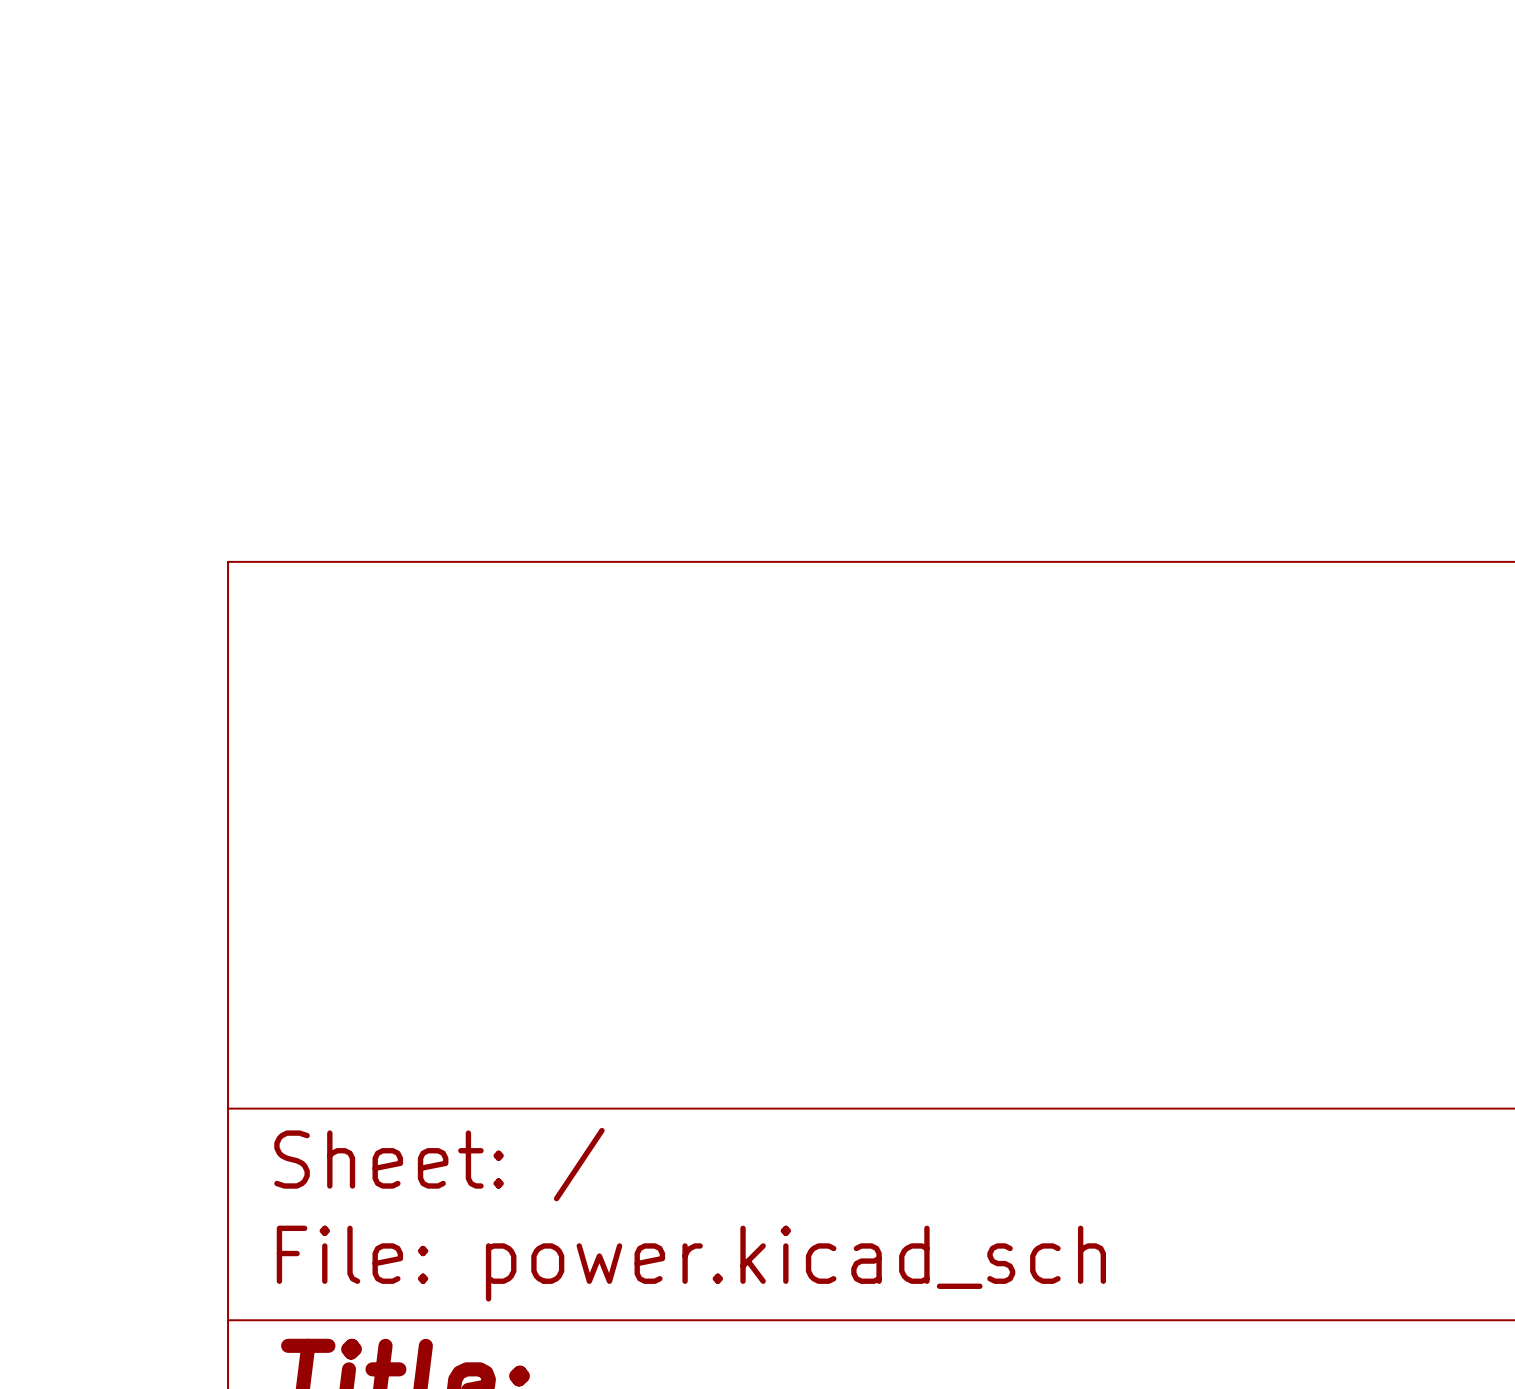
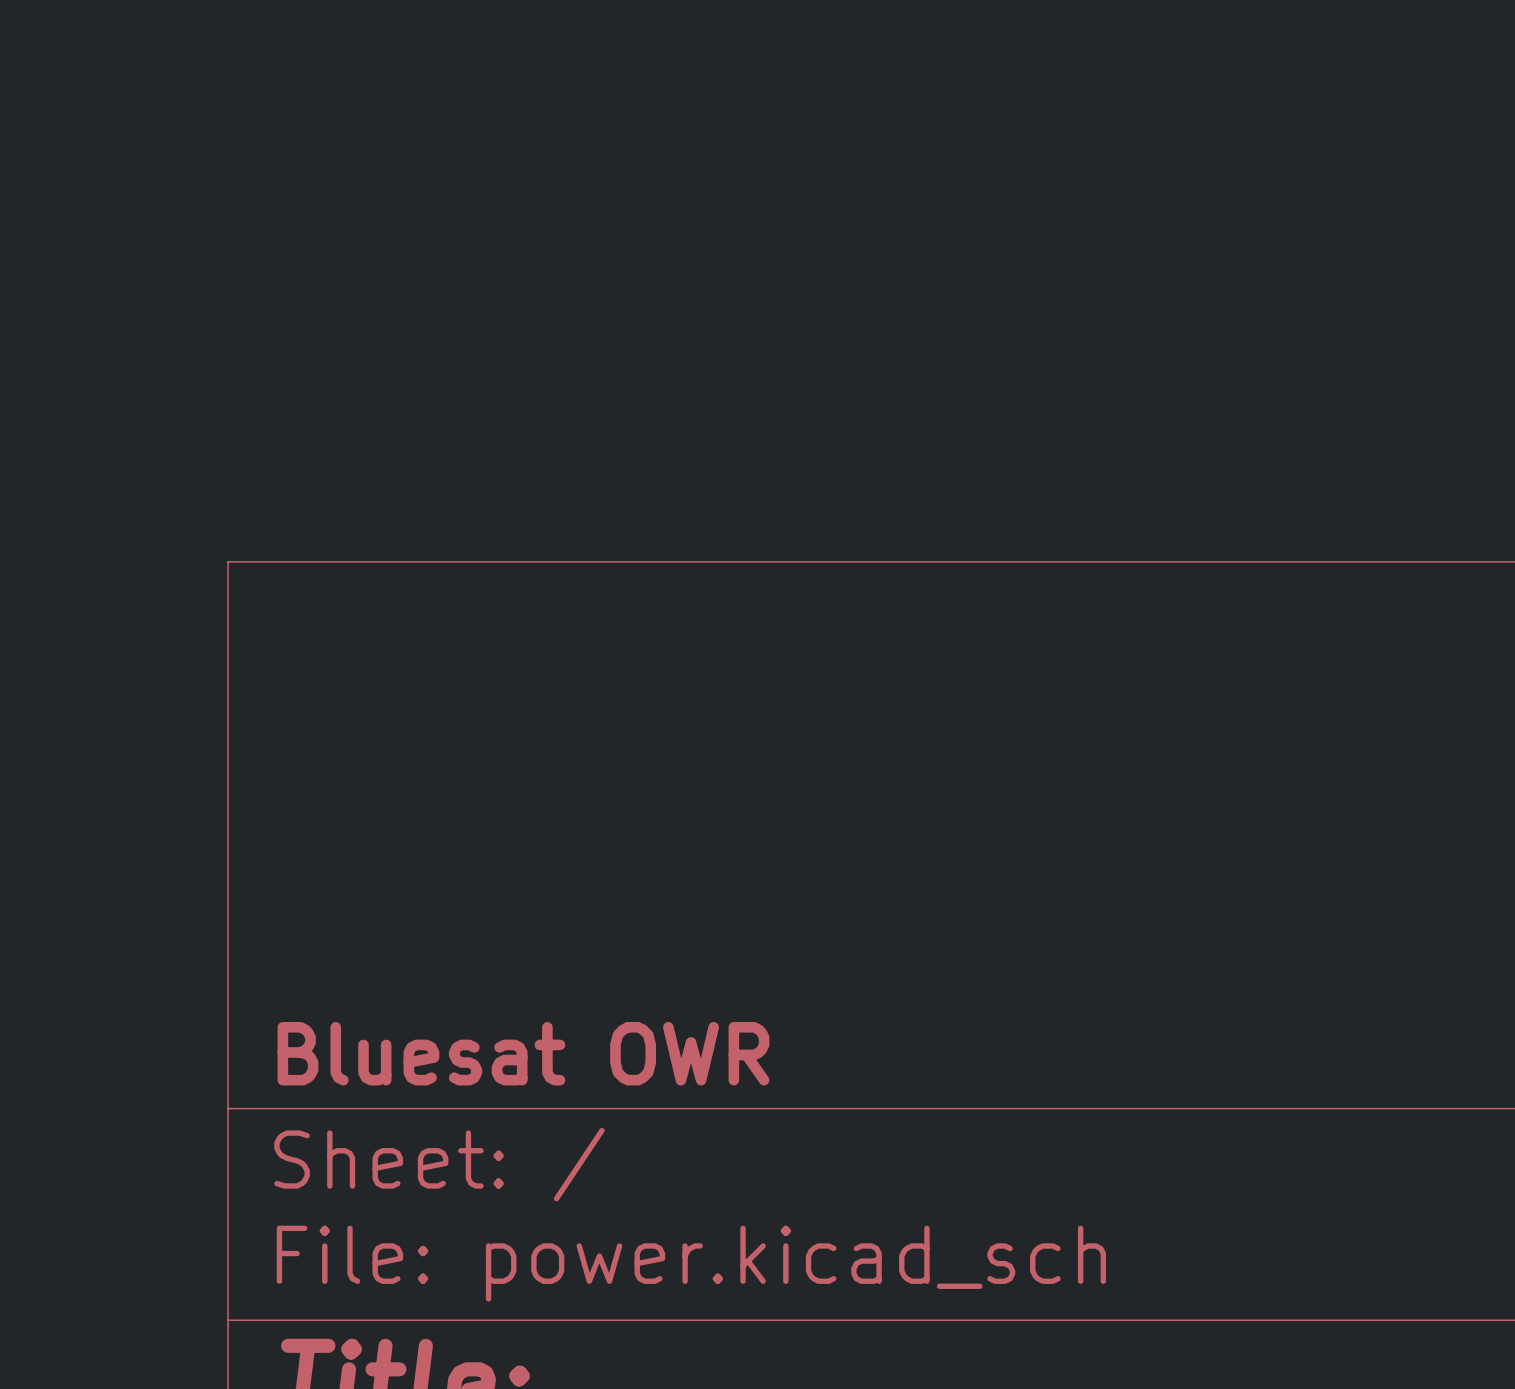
title block: none -> Bluesat OWR (523, 1053)

